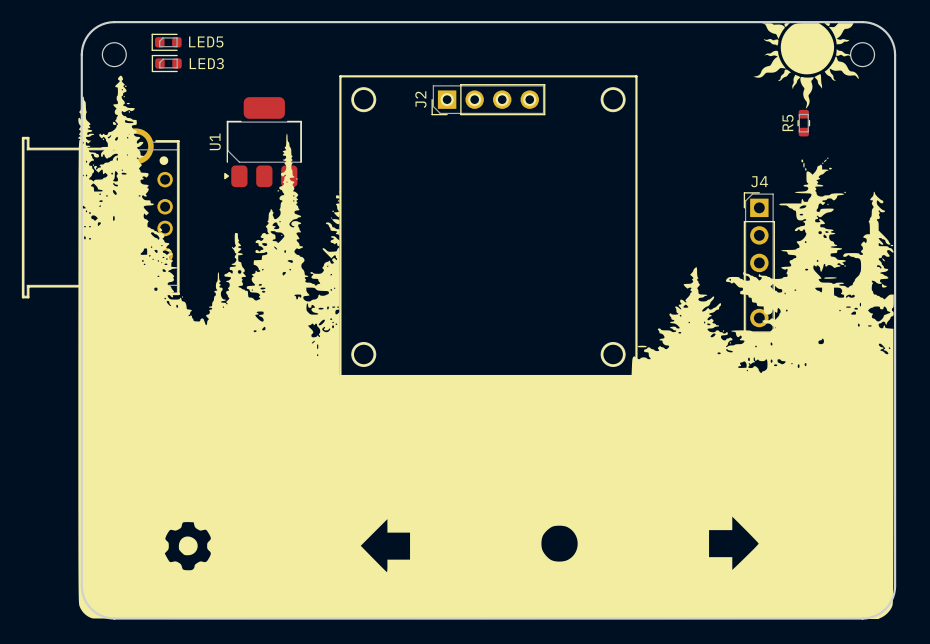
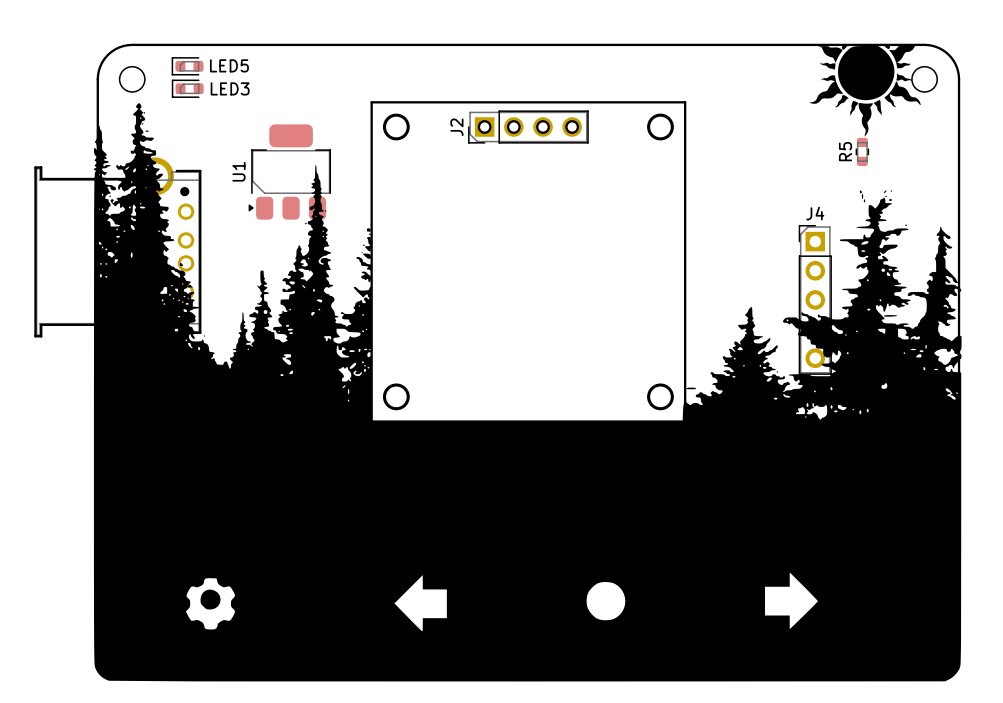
drawing shape: [78, 75, 894, 620] -> [93, 103, 962, 682]
drawing: [822, 157, 829, 164] -> none
drawing: none -> [885, 190, 893, 198]

